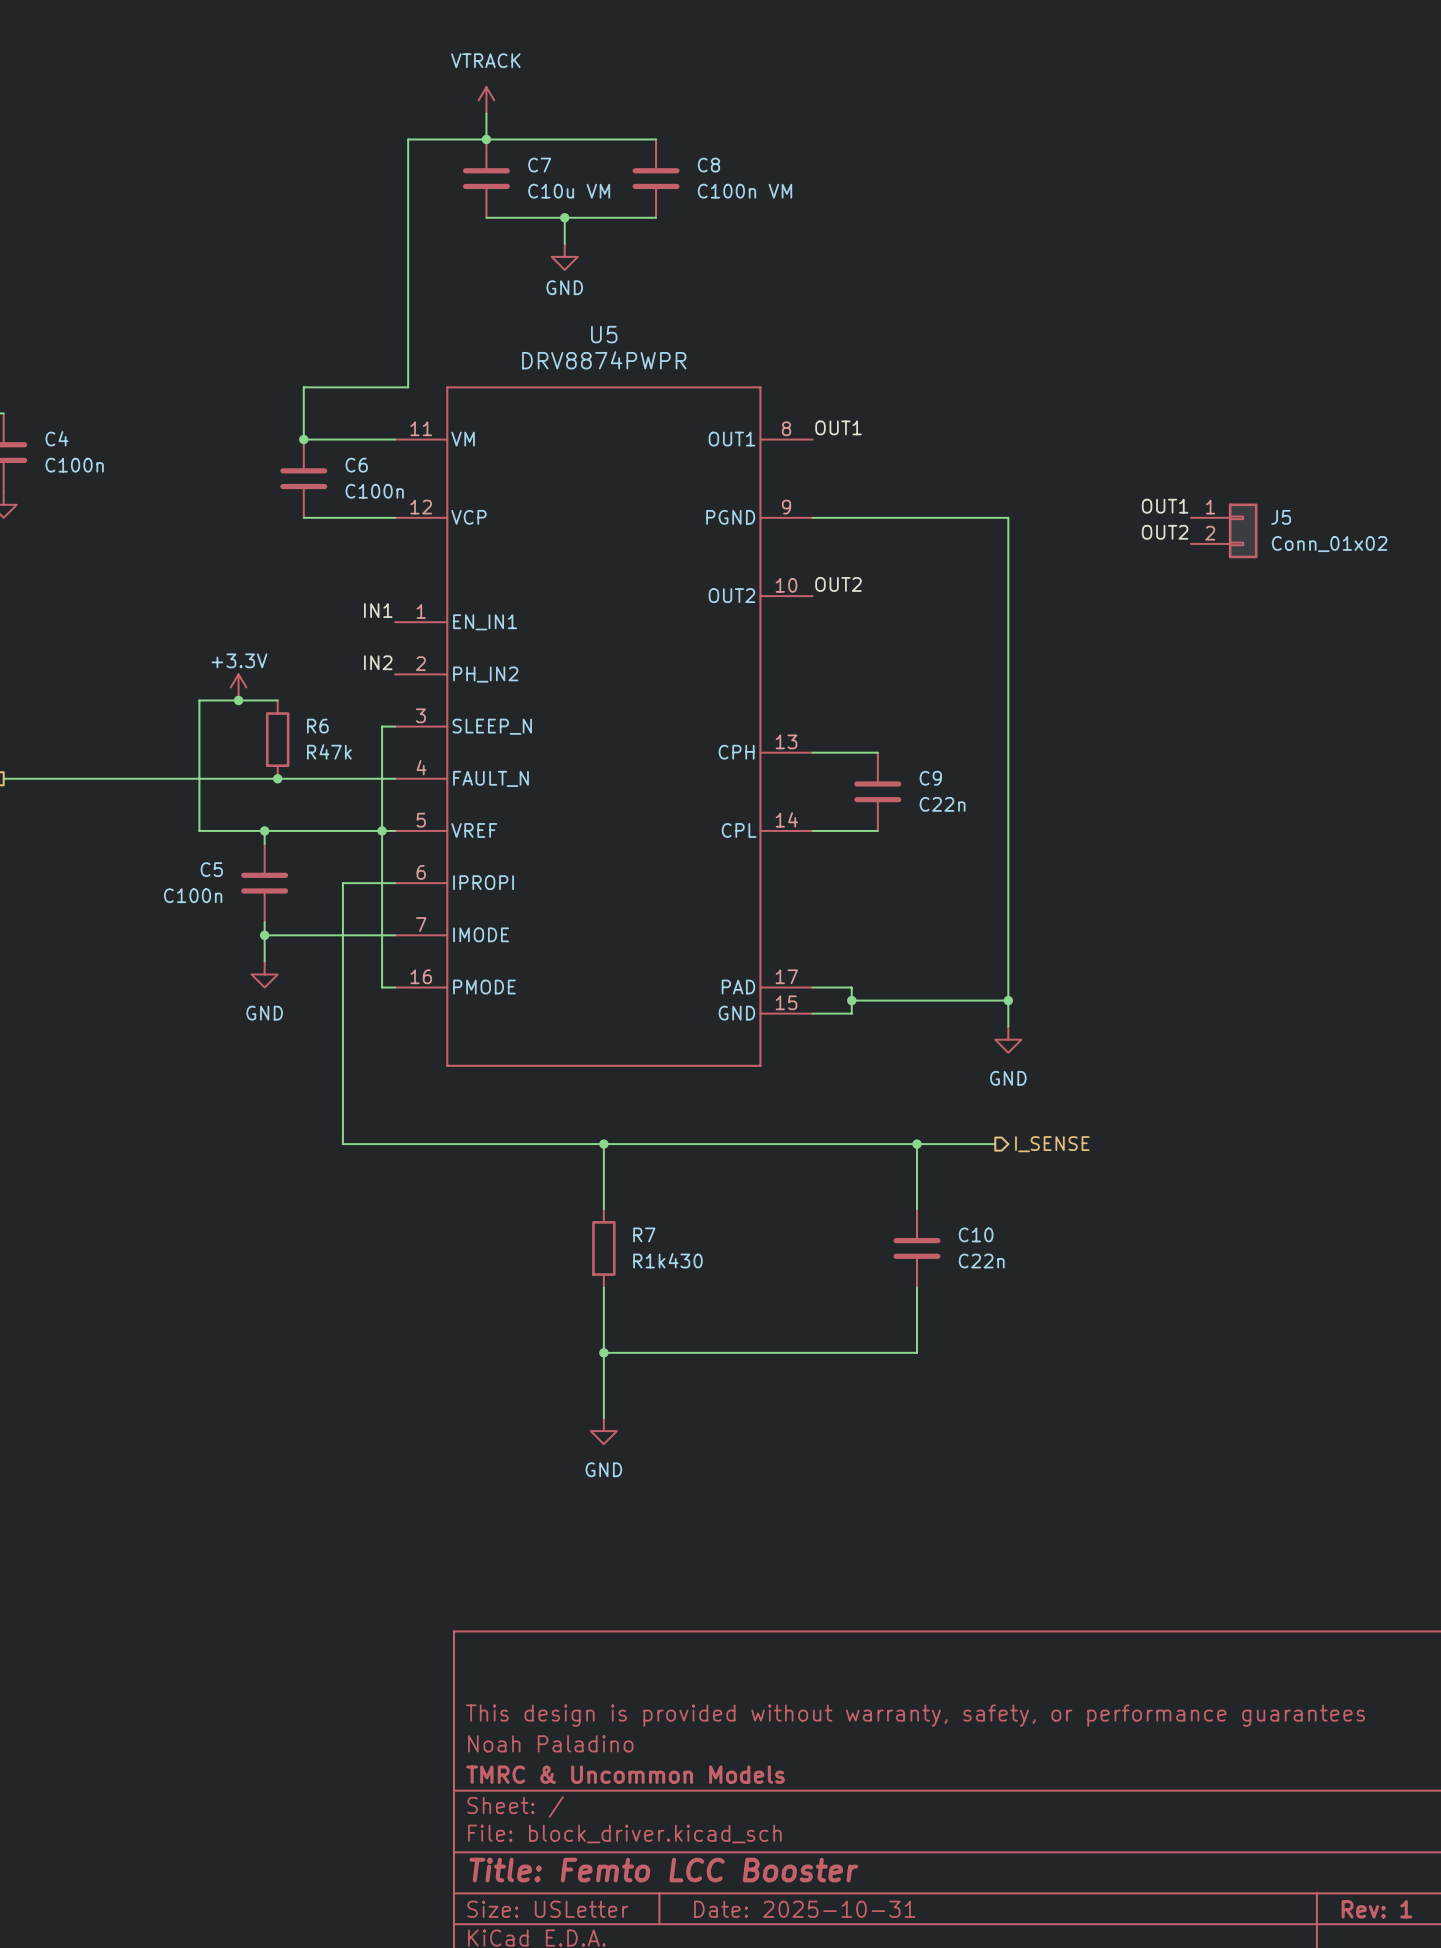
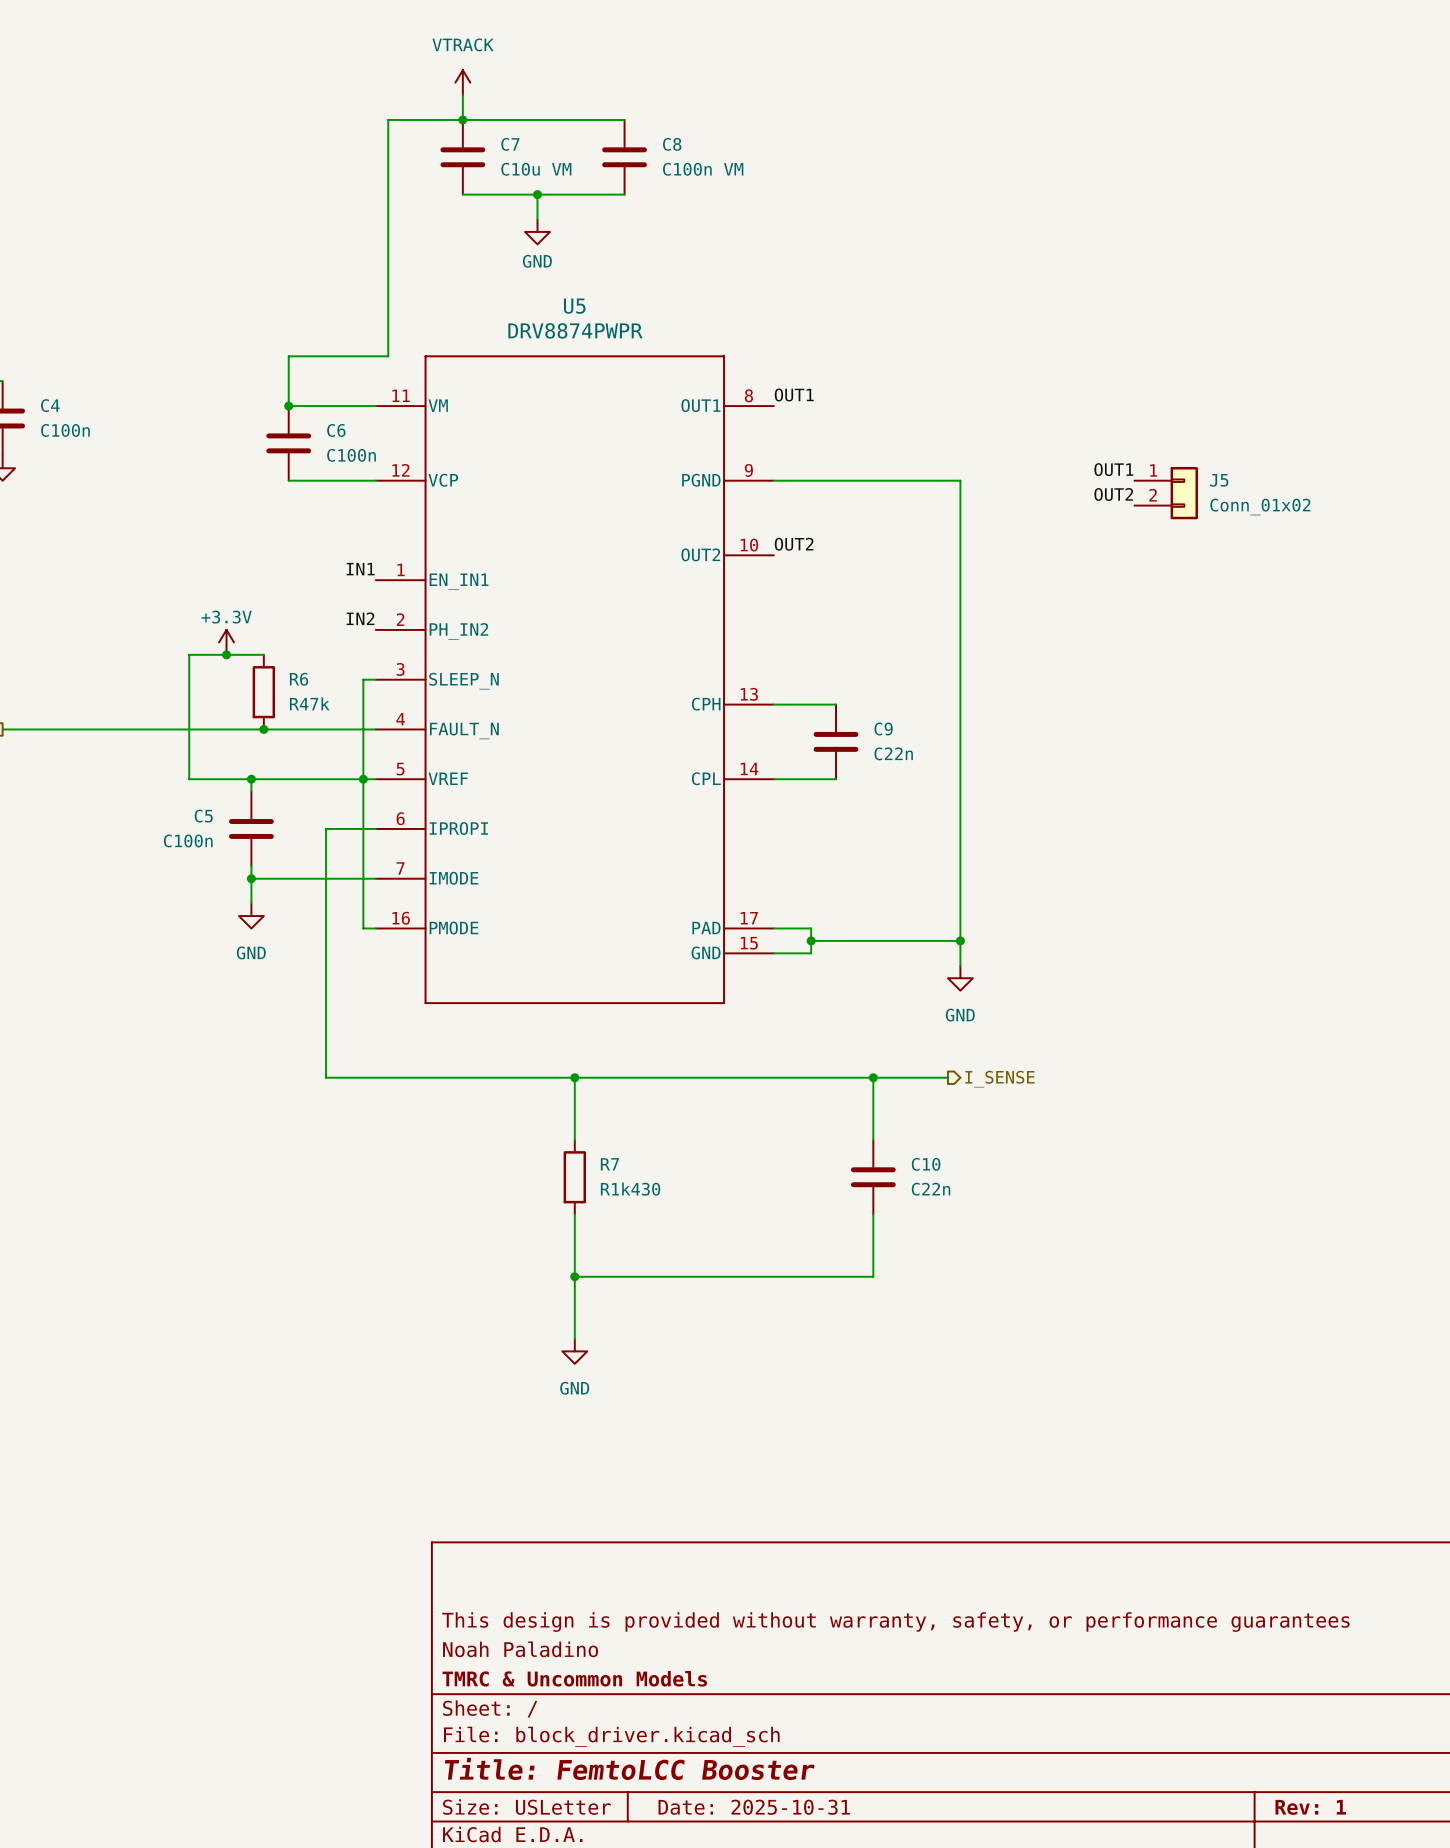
title block: Title: Femto LCC Booster (663, 1870) -> Title: FemtoLCC Booster (629, 1768)

